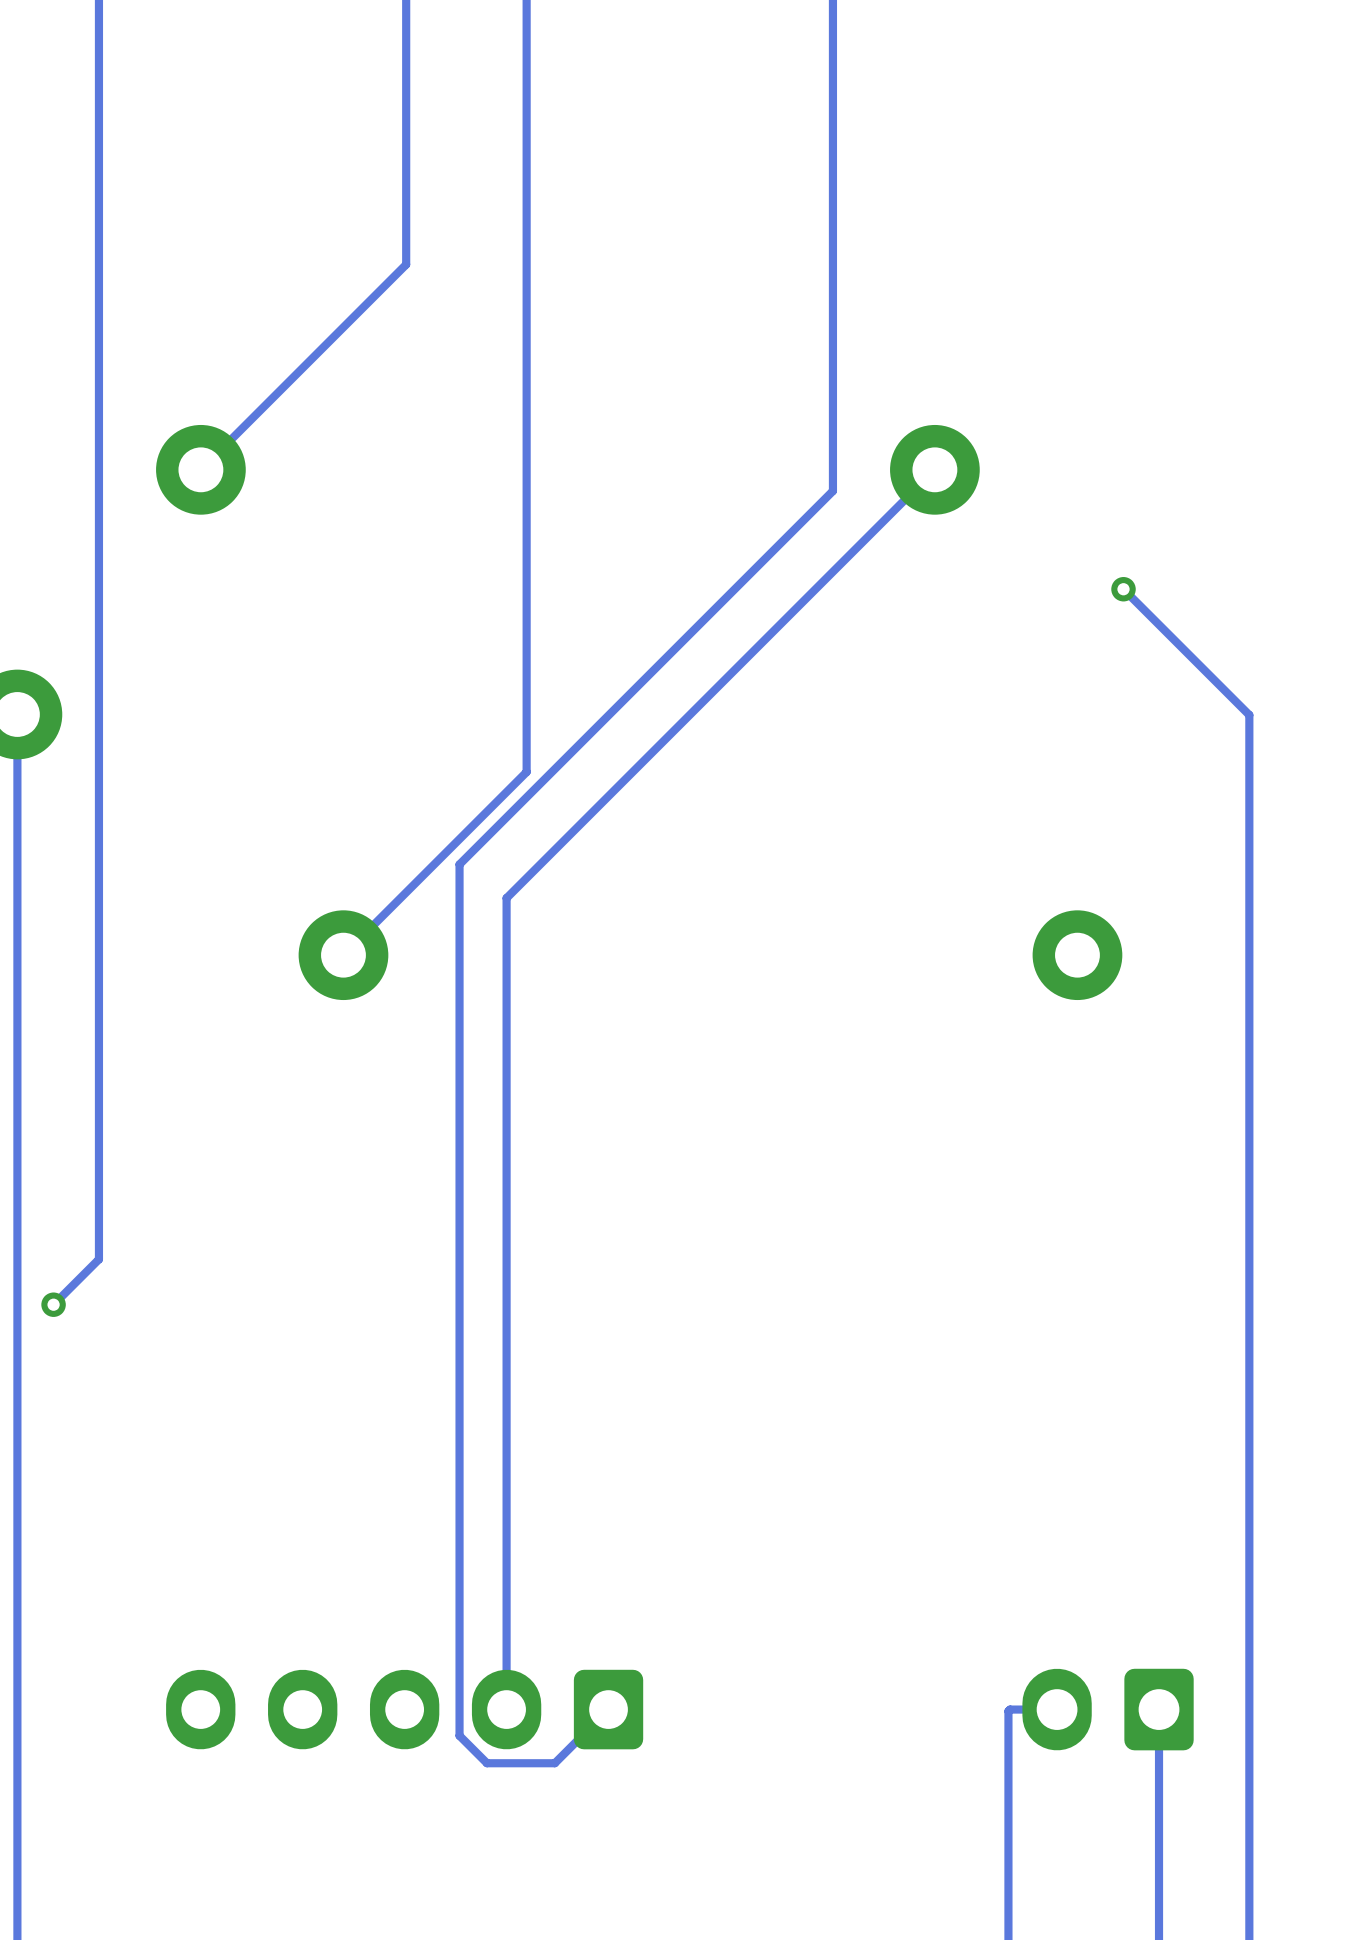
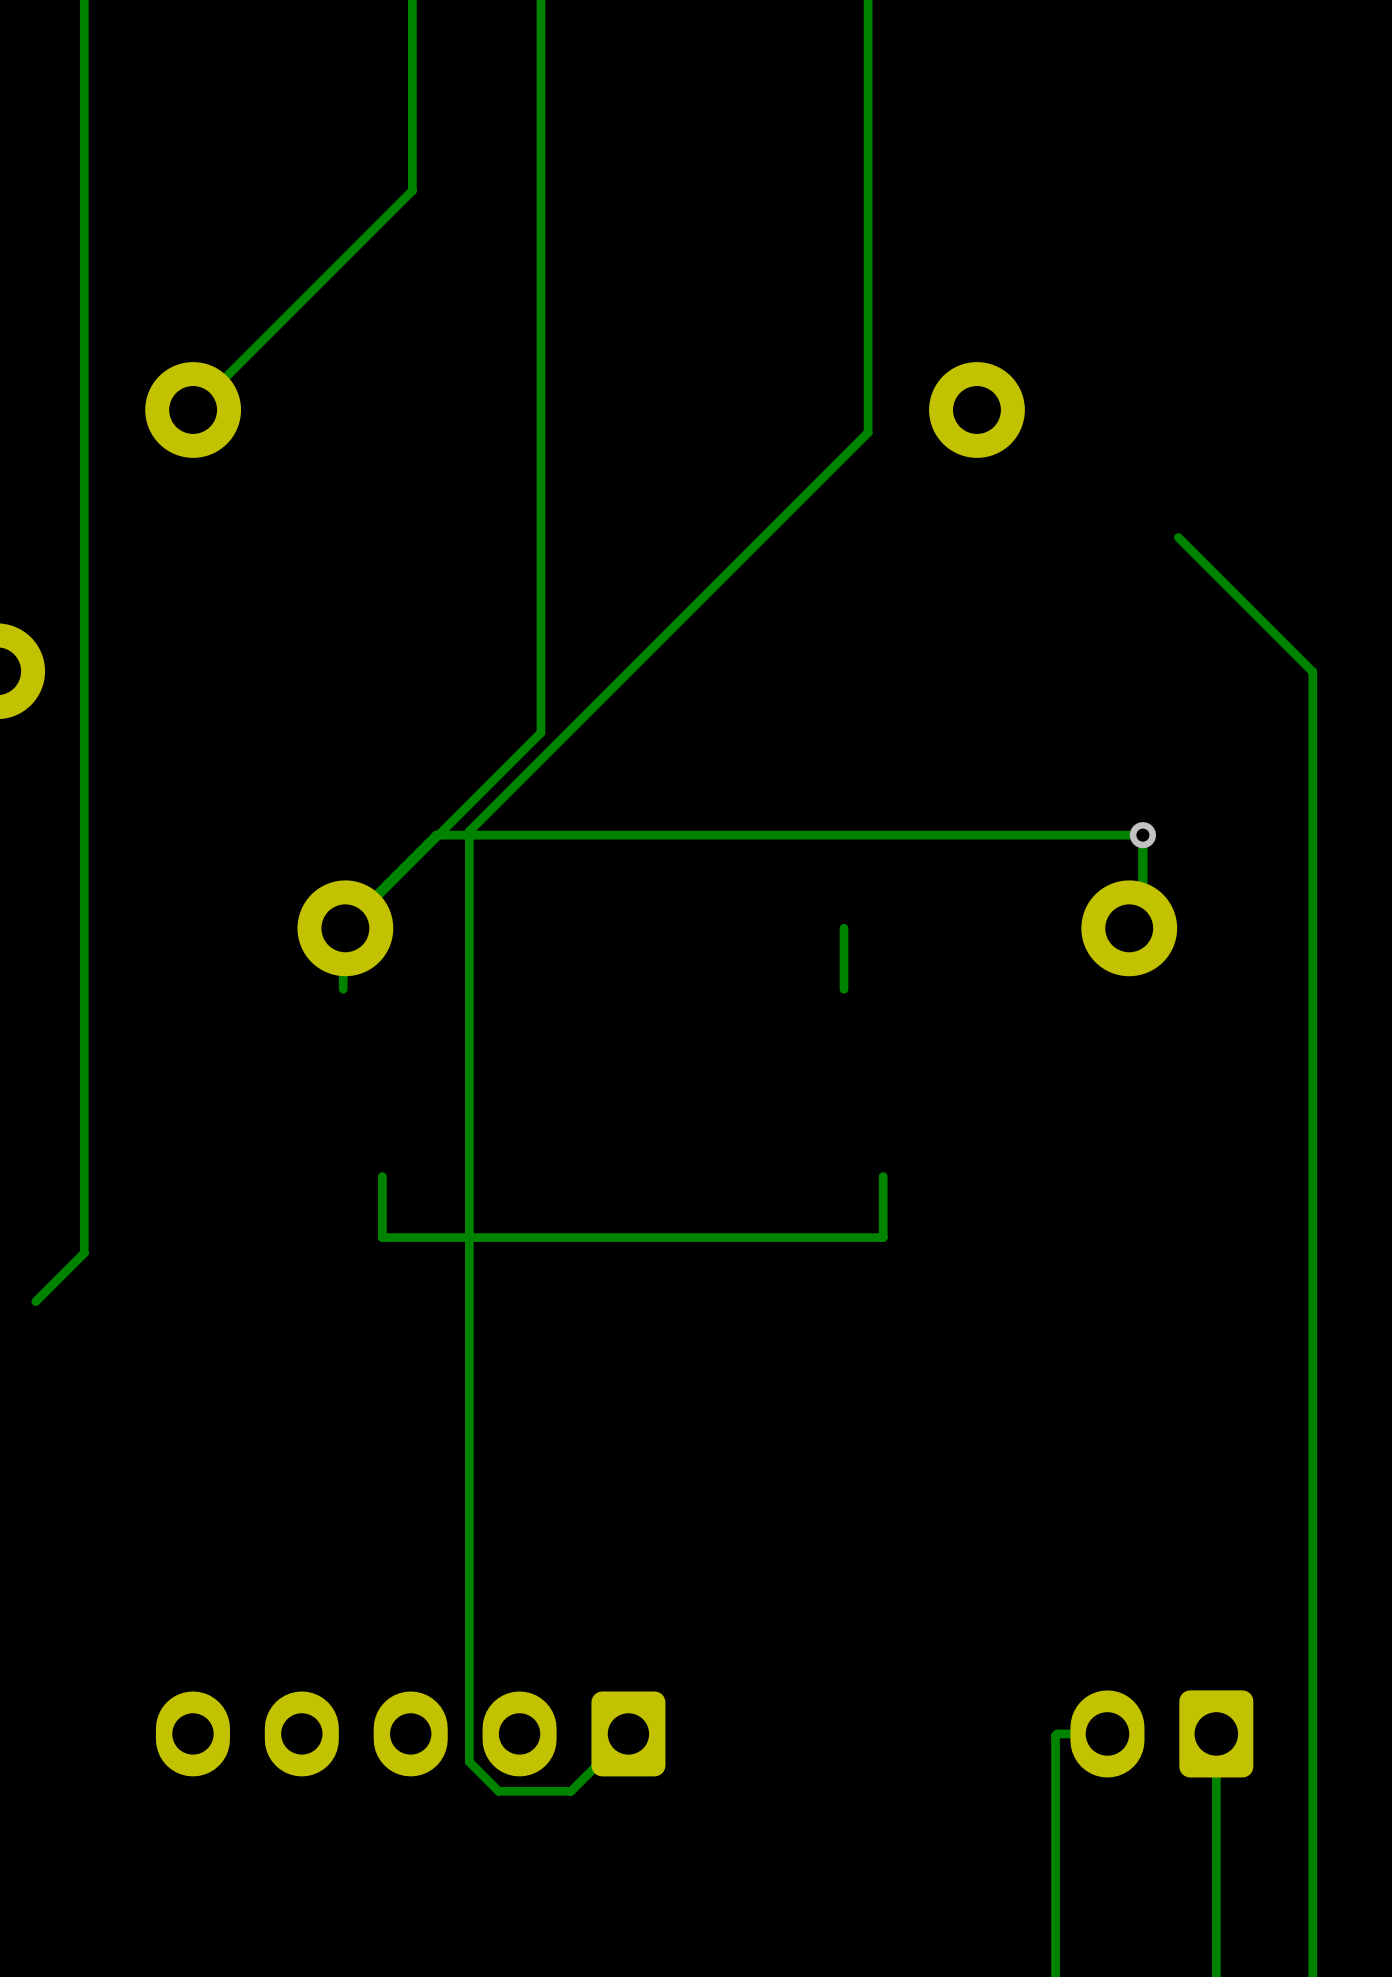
track: (934, 469) (506, 898) (506, 1709) -> none
via: (1123, 589) -> none
via: none -> (1142, 835)
track: none -> (1142, 894) (1142, 835) (436, 835) (343, 928) (343, 989)
track: none -> (844, 928) (844, 989)
track: none -> (883, 1176) (883, 1237) (382, 1237) (382, 1176)
via: (53, 1304) -> none

